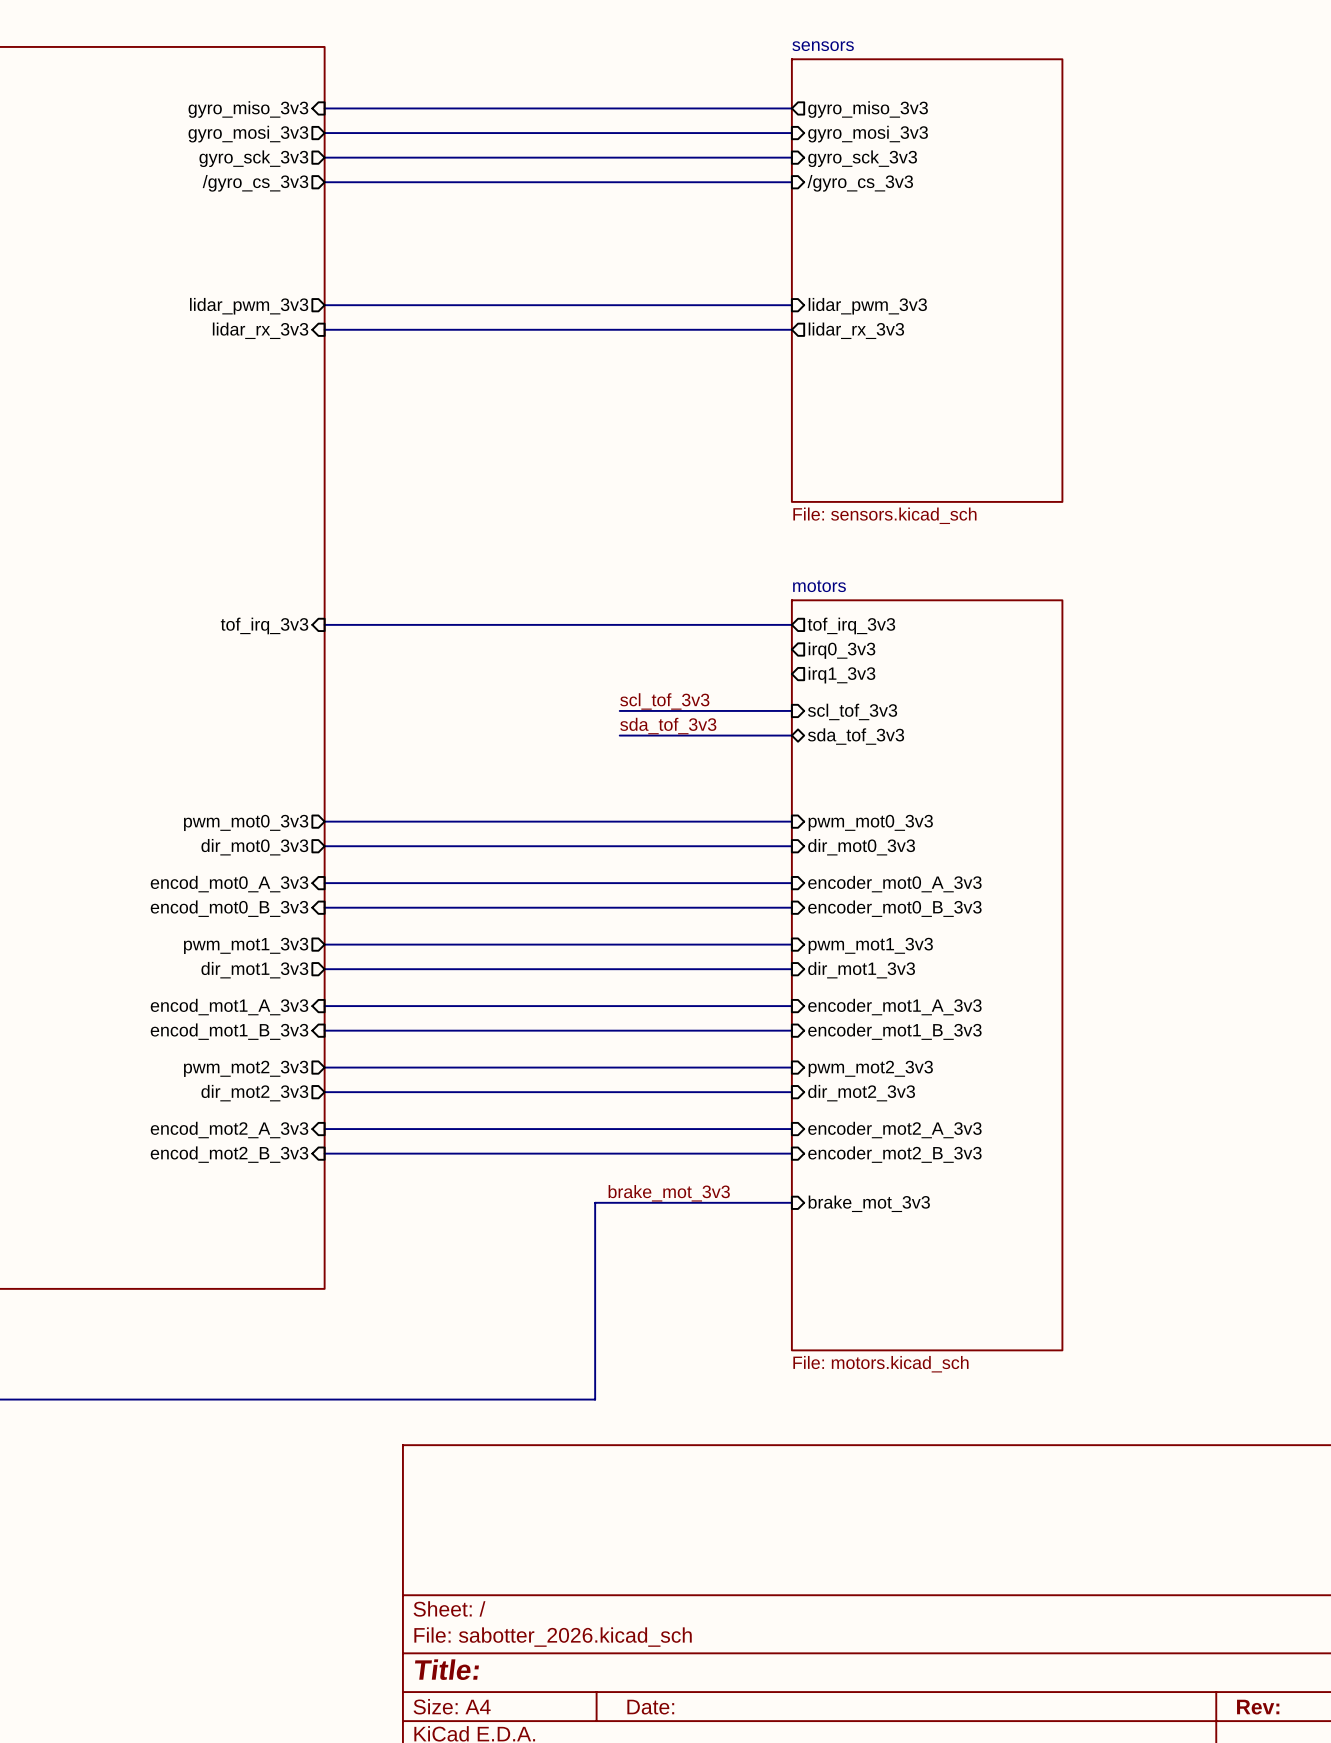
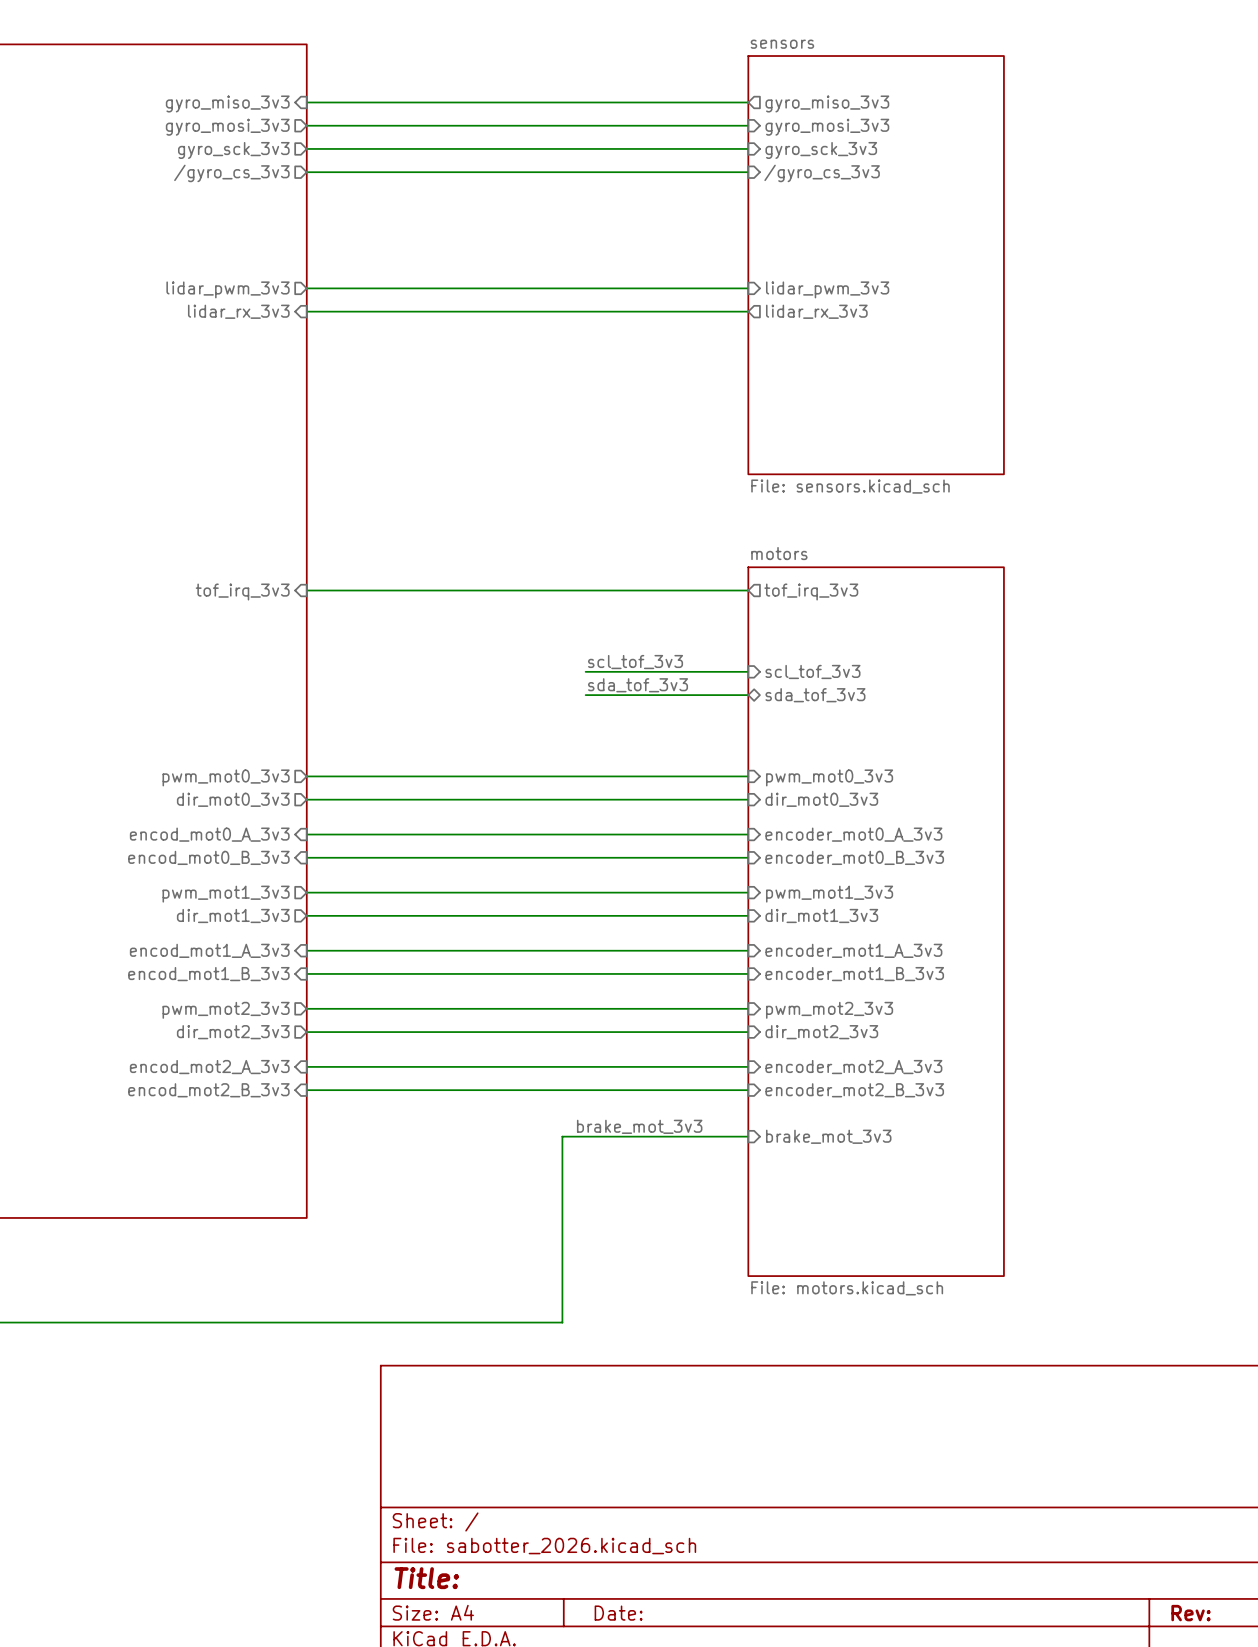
sheet pin: irq0_3v3 (841, 650) -> none
sheet pin: irq1_3v3 (841, 675) -> none

